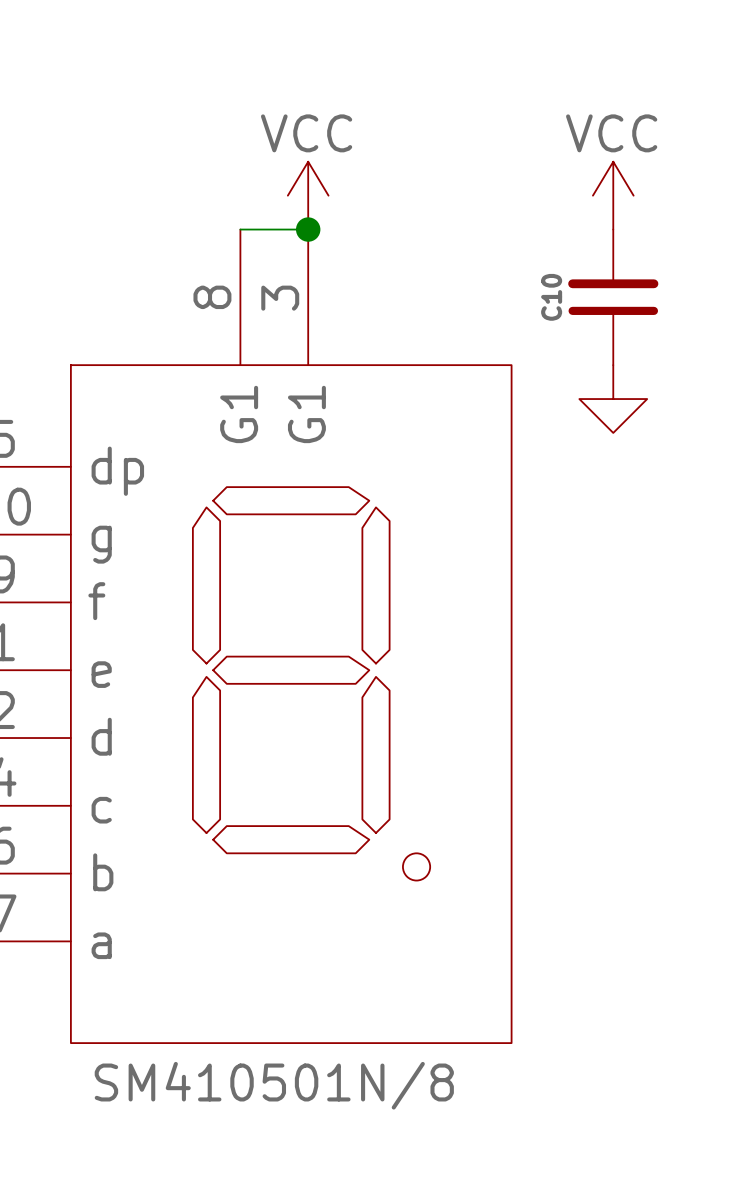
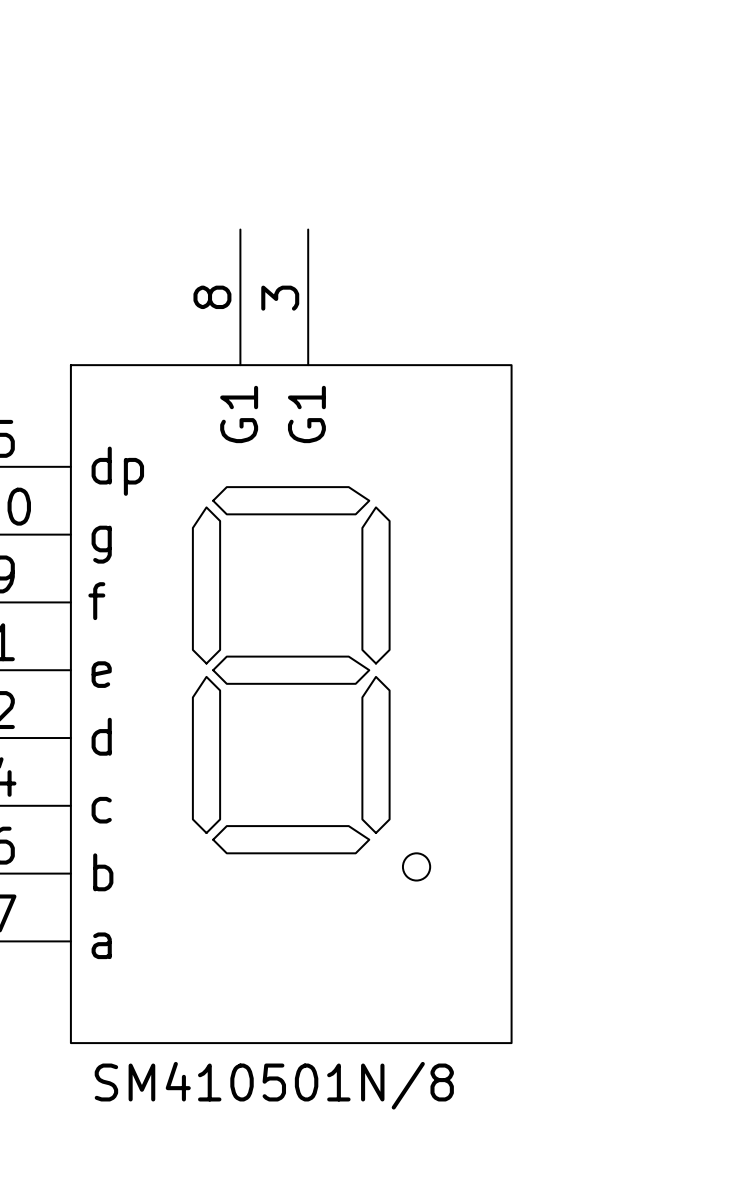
power symbol: VCC (308, 195) -> none
power symbol: VCC (613, 195) -> none
wire: (240, 229) (308, 229) -> none
junction: (308, 229) -> none
C10: (613, 297) -> none
power symbol: (613, 399) -> none

